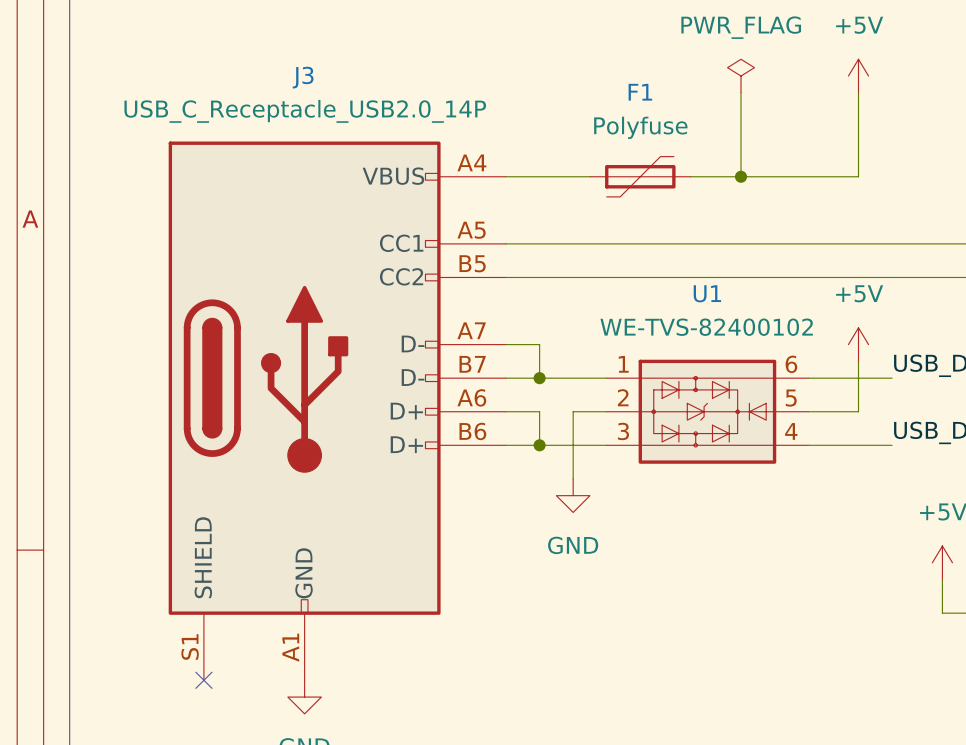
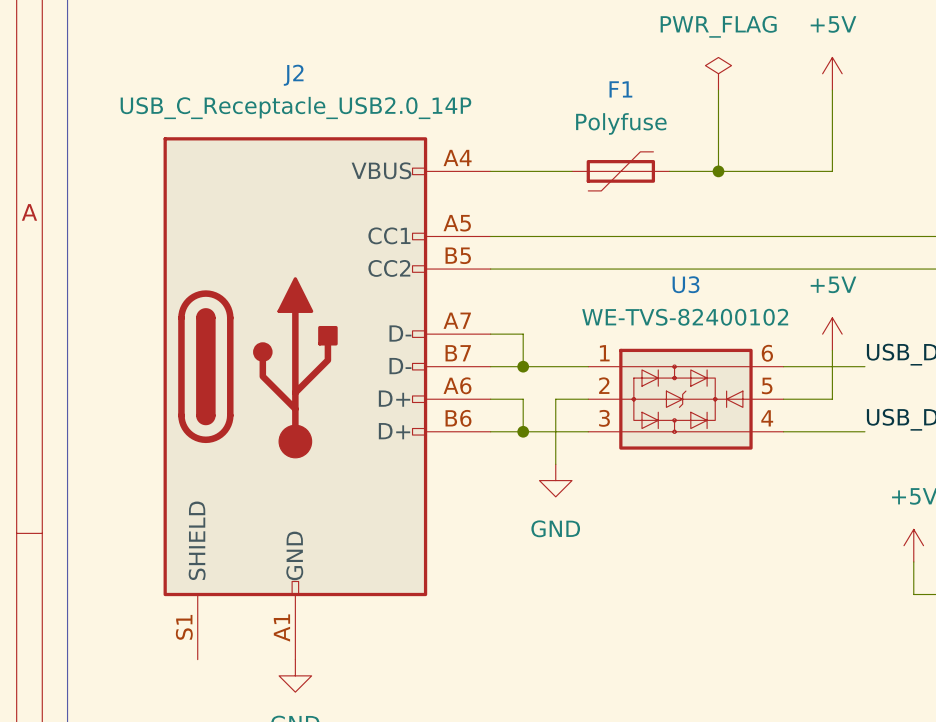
J3 name: J3 (303, 77) -> J2 (293, 75)
U1 name: U1 (707, 293) -> U3 (686, 284)
no-connect mark: (203, 680) -> none

